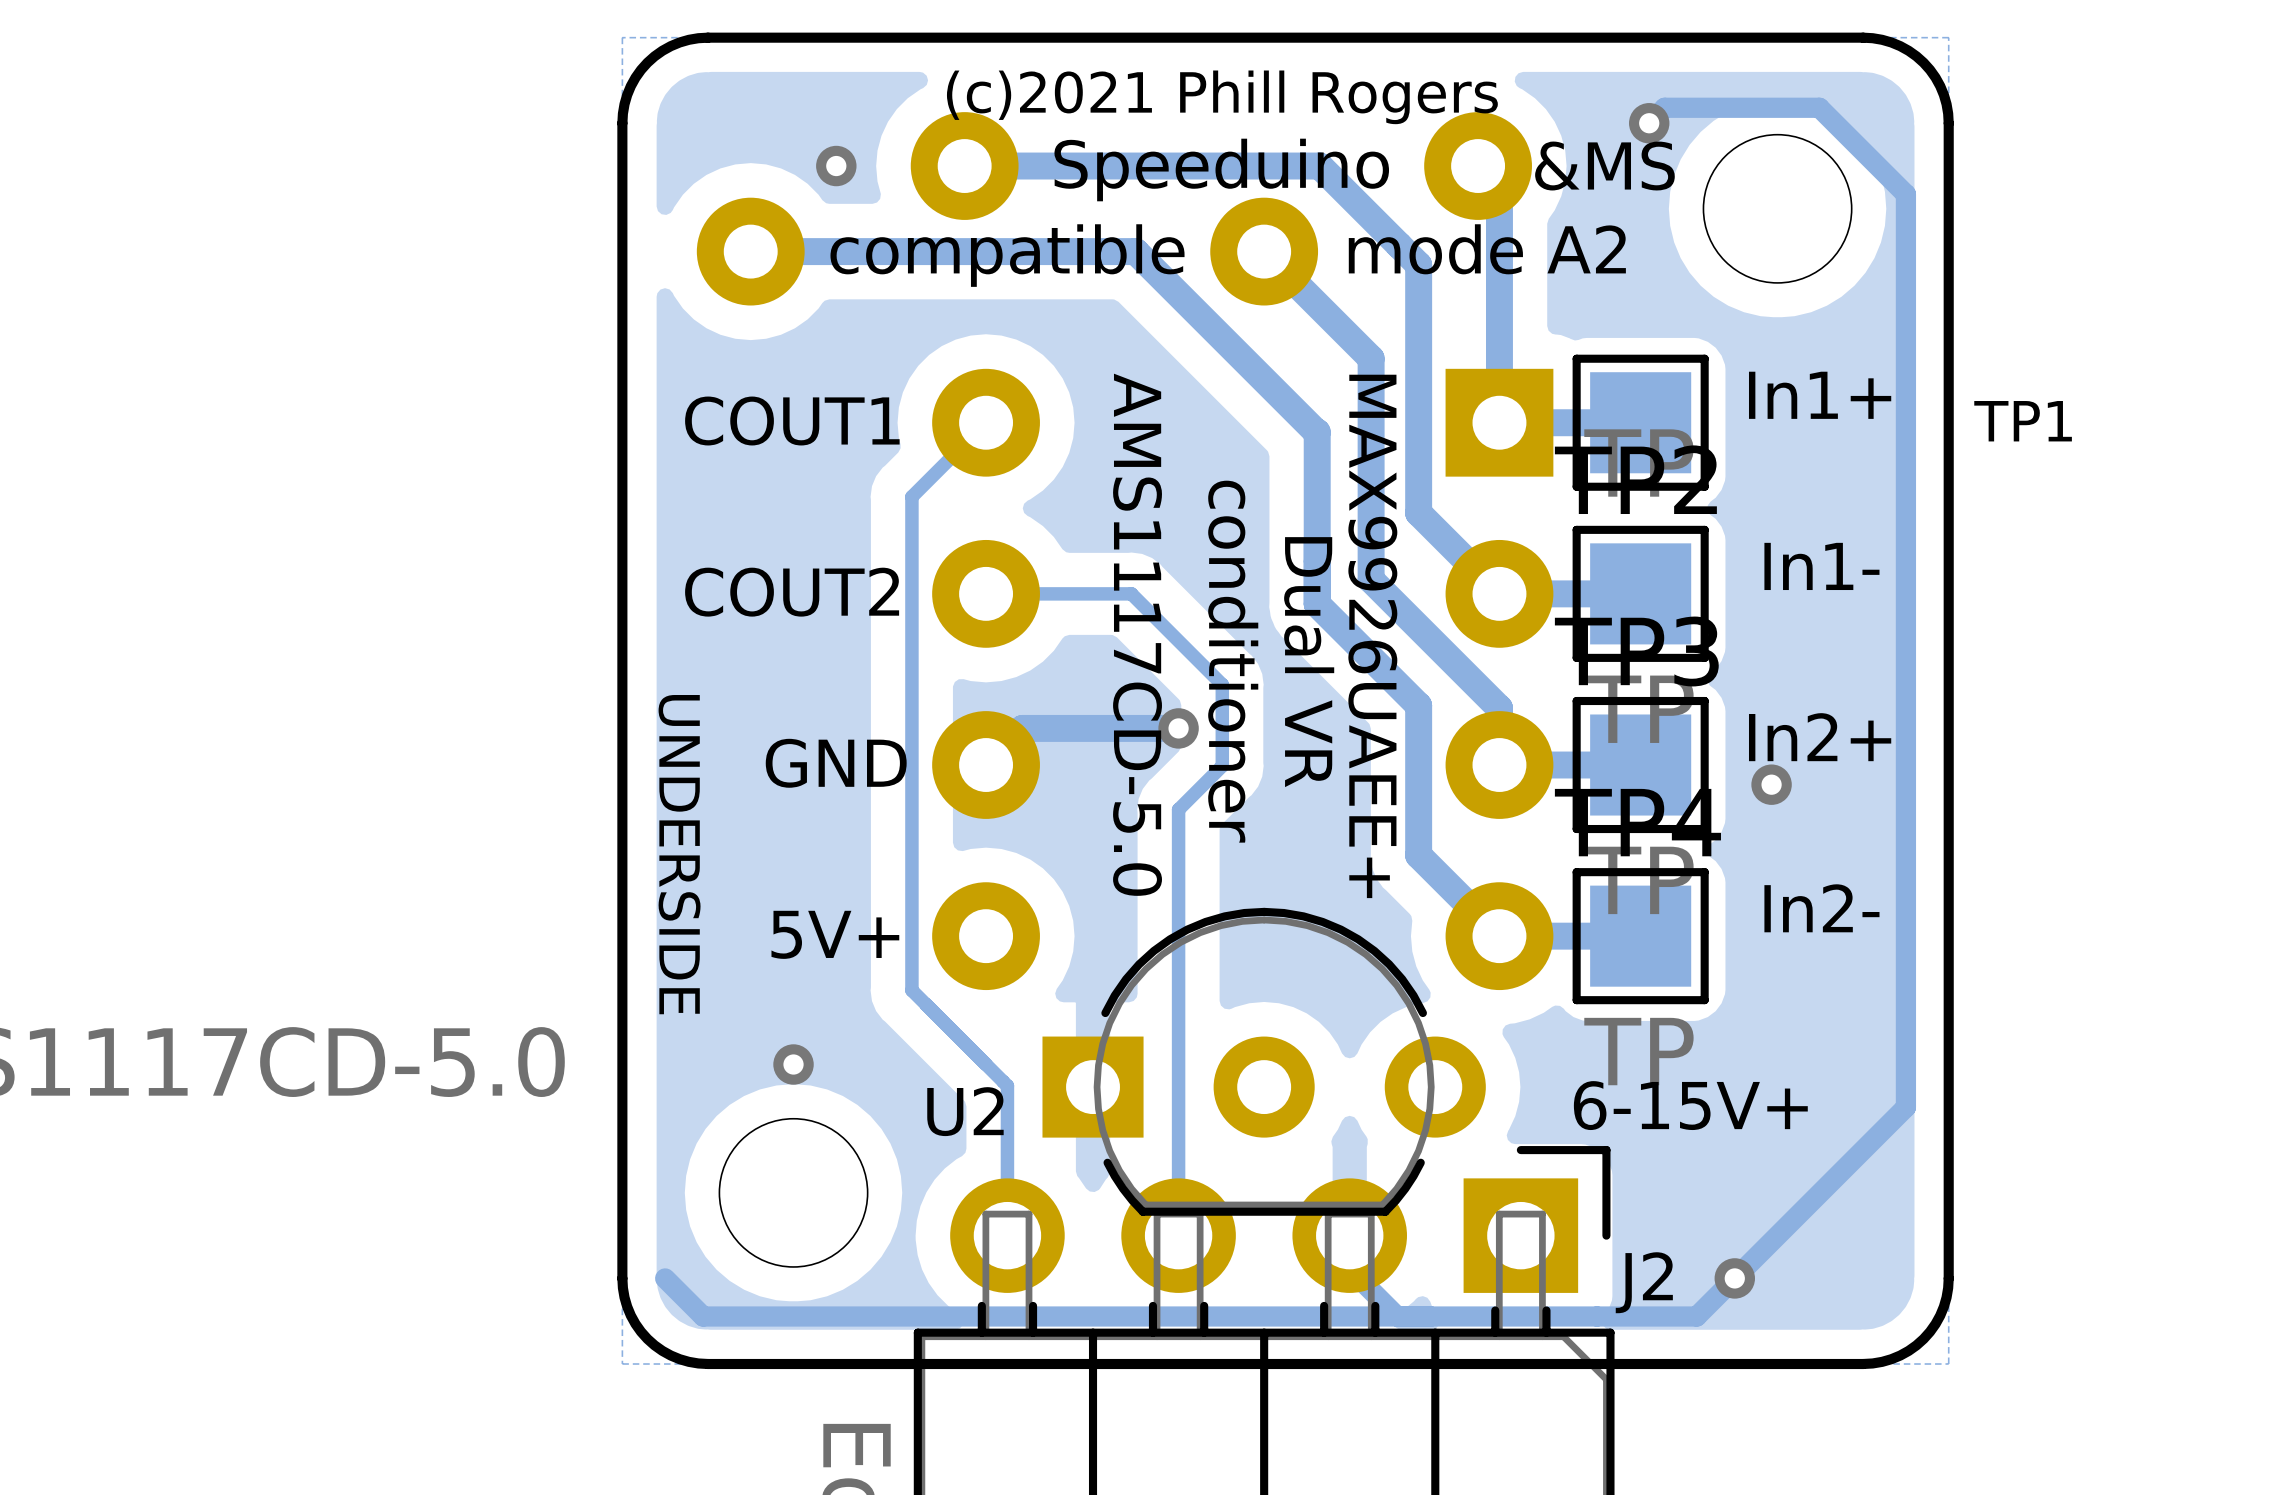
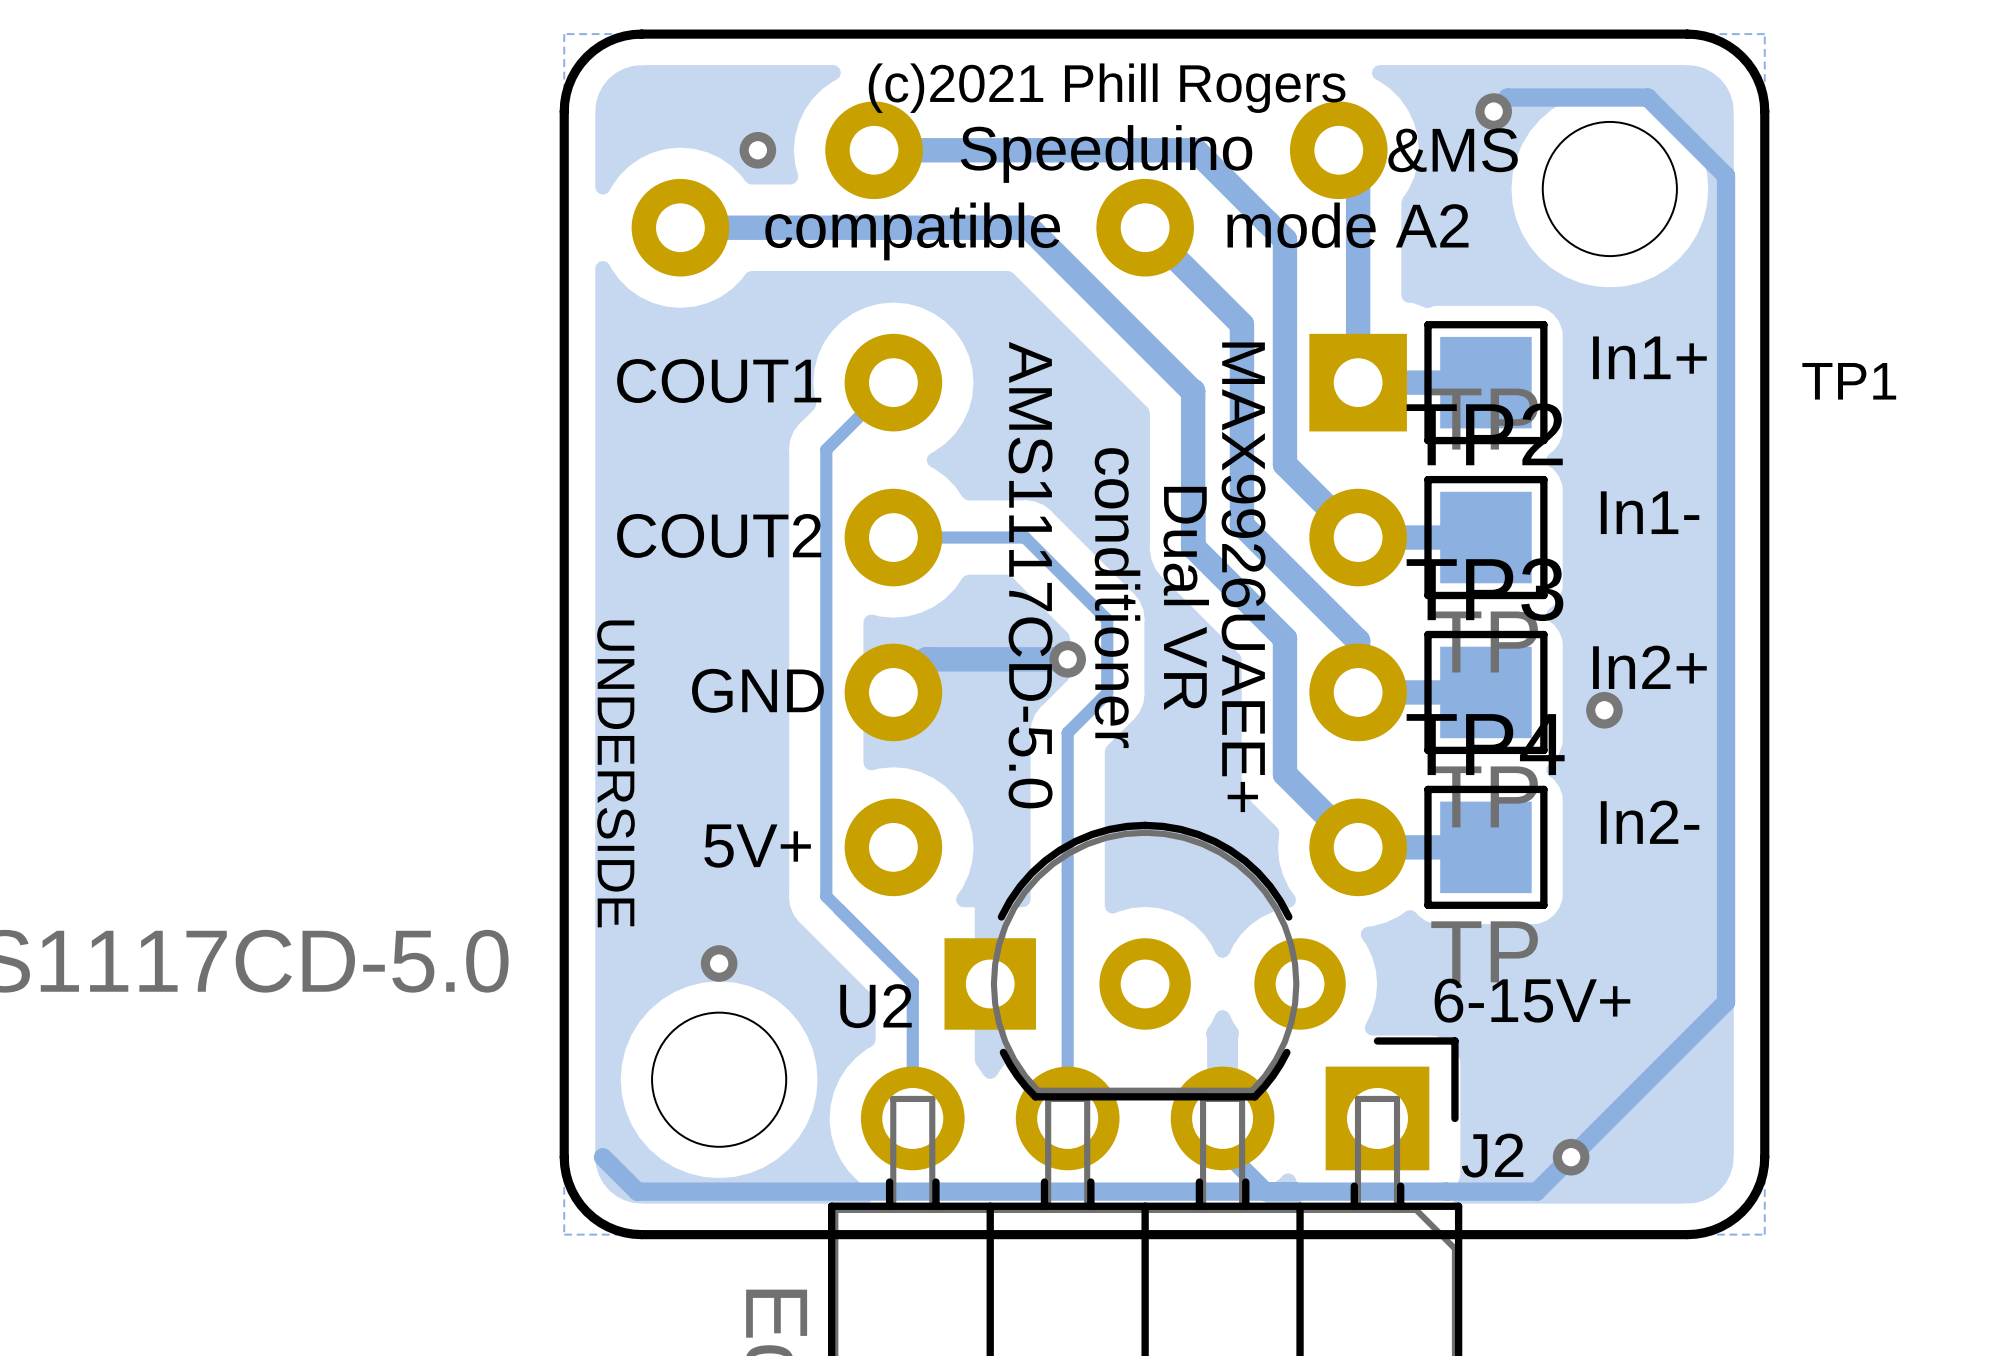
TP1 name position: TP1 (2023, 421) -> TP1 (1849, 381)

